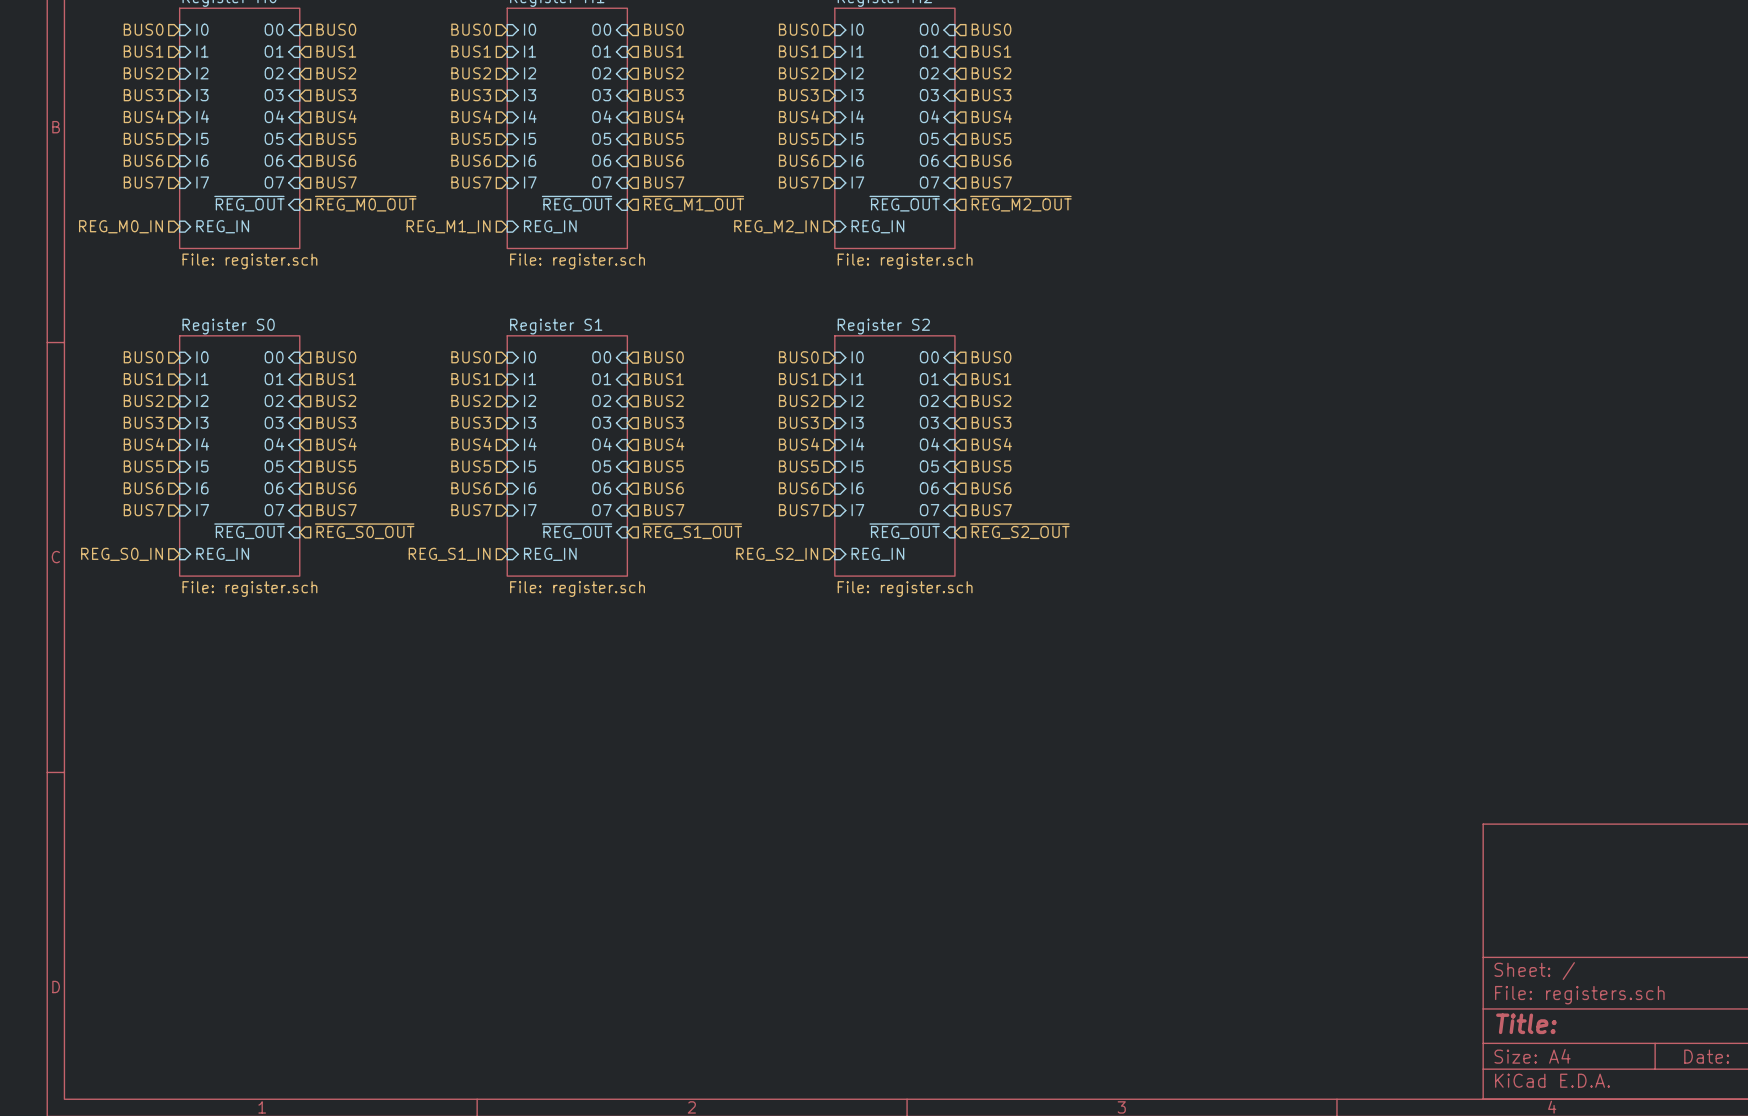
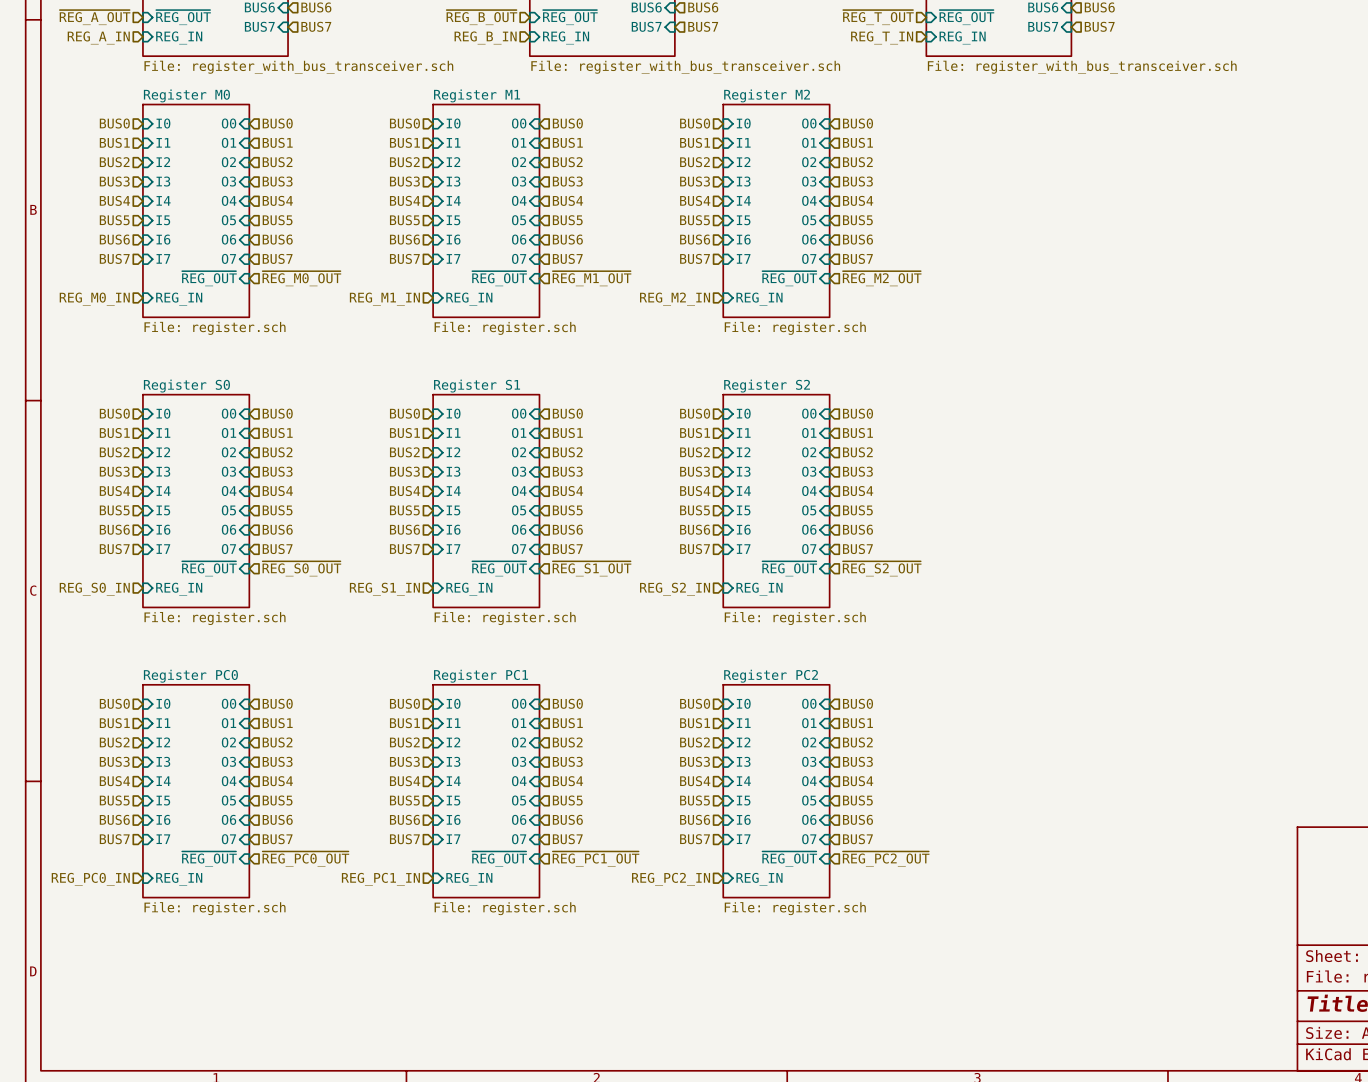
hierarchical label: none -> BUS0 (114, 703)
sheet pin: none -> I0 (163, 703)
sheet pin: none -> O0 (229, 703)
hierarchical label: none -> BUS0 (277, 703)
hierarchical label: none -> BUS0 (404, 703)
sheet pin: none -> I0 (453, 703)
sheet pin: none -> O0 (519, 703)
hierarchical label: none -> BUS0 (567, 703)
hierarchical label: none -> BUS0 (695, 703)
sheet pin: none -> I0 (743, 703)
sheet pin: none -> O0 (809, 703)
hierarchical label: none -> BUS0 (857, 703)
hierarchical label: none -> BUS1 (114, 723)
sheet pin: none -> I1 (163, 723)
sheet pin: none -> O1 (229, 723)
hierarchical label: none -> BUS1 (277, 723)
hierarchical label: none -> BUS1 (404, 723)
sheet pin: none -> I1 (453, 723)
sheet pin: none -> O1 (519, 723)
hierarchical label: none -> BUS1 (567, 723)
hierarchical label: none -> BUS1 (695, 723)
sheet pin: none -> I1 (743, 723)
sheet pin: none -> O1 (809, 723)
hierarchical label: none -> BUS1 (857, 723)
hierarchical label: none -> BUS2 (114, 742)
sheet pin: none -> I2 (163, 742)
sheet pin: none -> O2 (228, 742)
hierarchical label: none -> BUS2 (277, 742)
hierarchical label: none -> BUS2 (404, 742)
sheet pin: none -> I2 (453, 742)
sheet pin: none -> O2 (519, 742)
hierarchical label: none -> BUS2 (567, 742)
hierarchical label: none -> BUS2 (694, 742)
sheet pin: none -> I2 (743, 742)
sheet pin: none -> O2 (809, 742)
hierarchical label: none -> BUS2 (857, 742)
hierarchical label: none -> BUS3 (114, 761)
sheet pin: none -> I3 (163, 761)
sheet pin: none -> O3 (228, 761)
hierarchical label: none -> BUS3 (277, 761)
hierarchical label: none -> BUS3 (404, 761)
sheet pin: none -> I3 (453, 761)
sheet pin: none -> O3 (519, 761)
hierarchical label: none -> BUS3 (567, 761)
hierarchical label: none -> BUS3 (695, 761)
sheet pin: none -> I3 (743, 761)
sheet pin: none -> O3 (809, 761)
hierarchical label: none -> BUS3 (857, 761)
hierarchical label: none -> BUS4 (114, 781)
sheet pin: none -> I4 (163, 781)
sheet pin: none -> O4 (229, 781)
hierarchical label: none -> BUS4 (277, 781)
hierarchical label: none -> BUS4 (405, 781)
sheet pin: none -> I4 (453, 781)
sheet pin: none -> O4 (519, 781)
hierarchical label: none -> BUS4 (567, 781)
hierarchical label: none -> BUS4 (695, 781)
sheet pin: none -> I4 (743, 781)
sheet pin: none -> O4 (809, 781)
hierarchical label: none -> BUS4 (858, 781)
sheet Register PC0: none -> File: register.sch (196, 791)
sheet Register PC1: none -> File: register.sch (486, 791)
sheet Register PC2: none -> File: register.sch (776, 791)
hierarchical label: none -> BUS5 (114, 800)
sheet pin: none -> I5 (163, 800)
sheet pin: none -> O5 (228, 800)
hierarchical label: none -> BUS5 (277, 800)
hierarchical label: none -> BUS5 (404, 800)
sheet pin: none -> I5 (453, 800)
sheet pin: none -> O5 (519, 800)
hierarchical label: none -> BUS5 (567, 800)
hierarchical label: none -> BUS5 (695, 800)
sheet pin: none -> I5 (743, 800)
sheet pin: none -> O5 (809, 800)
hierarchical label: none -> BUS5 (857, 800)
hierarchical label: none -> BUS6 (114, 819)
sheet pin: none -> I6 (163, 819)
sheet pin: none -> O6 (229, 819)
hierarchical label: none -> BUS6 (277, 819)
hierarchical label: none -> BUS6 (404, 819)
sheet pin: none -> I6 (453, 819)
sheet pin: none -> O6 (519, 819)
hierarchical label: none -> BUS6 (567, 819)
hierarchical label: none -> BUS6 (695, 819)
sheet pin: none -> I6 (743, 819)
sheet pin: none -> O6 (809, 819)
hierarchical label: none -> BUS6 (857, 819)
hierarchical label: none -> BUS7 (114, 839)
sheet pin: none -> I7 (163, 839)
sheet pin: none -> O7 (228, 839)
hierarchical label: none -> BUS7 (277, 839)
hierarchical label: none -> BUS7 (404, 839)
sheet pin: none -> I7 (453, 839)
sheet pin: none -> O7 (519, 839)
hierarchical label: none -> BUS7 (567, 839)
hierarchical label: none -> BUS7 (695, 839)
sheet pin: none -> I7 (743, 839)
sheet pin: none -> O7 (809, 839)
hierarchical label: none -> BUS7 (857, 839)
sheet pin: none -> ~{REG_OUT} (209, 858)
hierarchical label: none -> ~{REG_PC0_OUT} (305, 858)
sheet pin: none -> ~{REG_OUT} (499, 858)
hierarchical label: none -> ~{REG_PC1_OUT} (596, 858)
sheet pin: none -> ~{REG_OUT} (789, 858)
hierarchical label: none -> ~{REG_PC2_OUT} (886, 858)
hierarchical label: none -> REG_PC0_IN (90, 879)
sheet pin: none -> REG_IN (179, 879)
hierarchical label: none -> REG_PC1_IN (380, 879)
sheet pin: none -> REG_IN (469, 879)
hierarchical label: none -> REG_PC2_IN (671, 879)
sheet pin: none -> REG_IN (759, 879)

